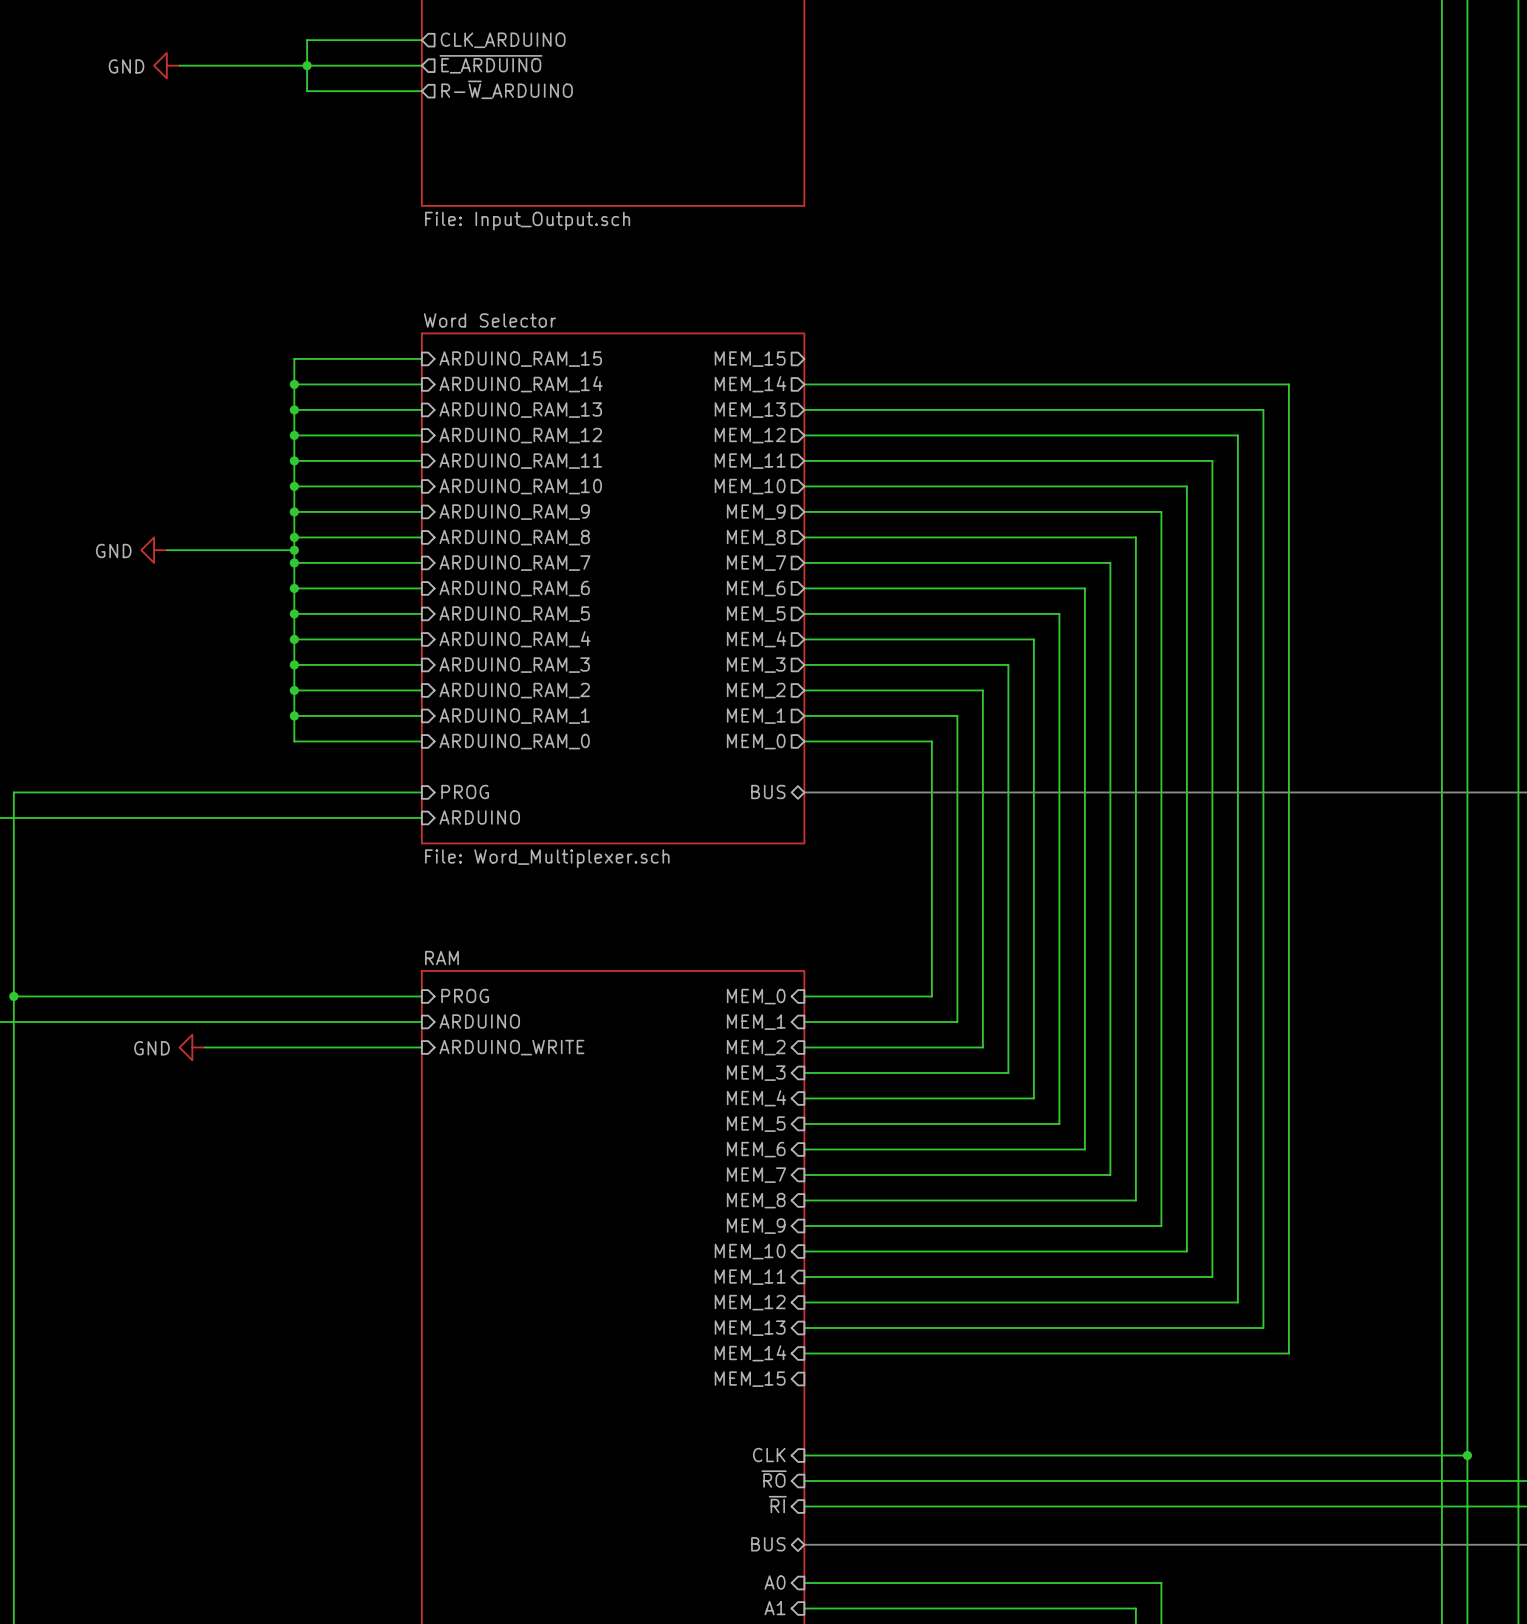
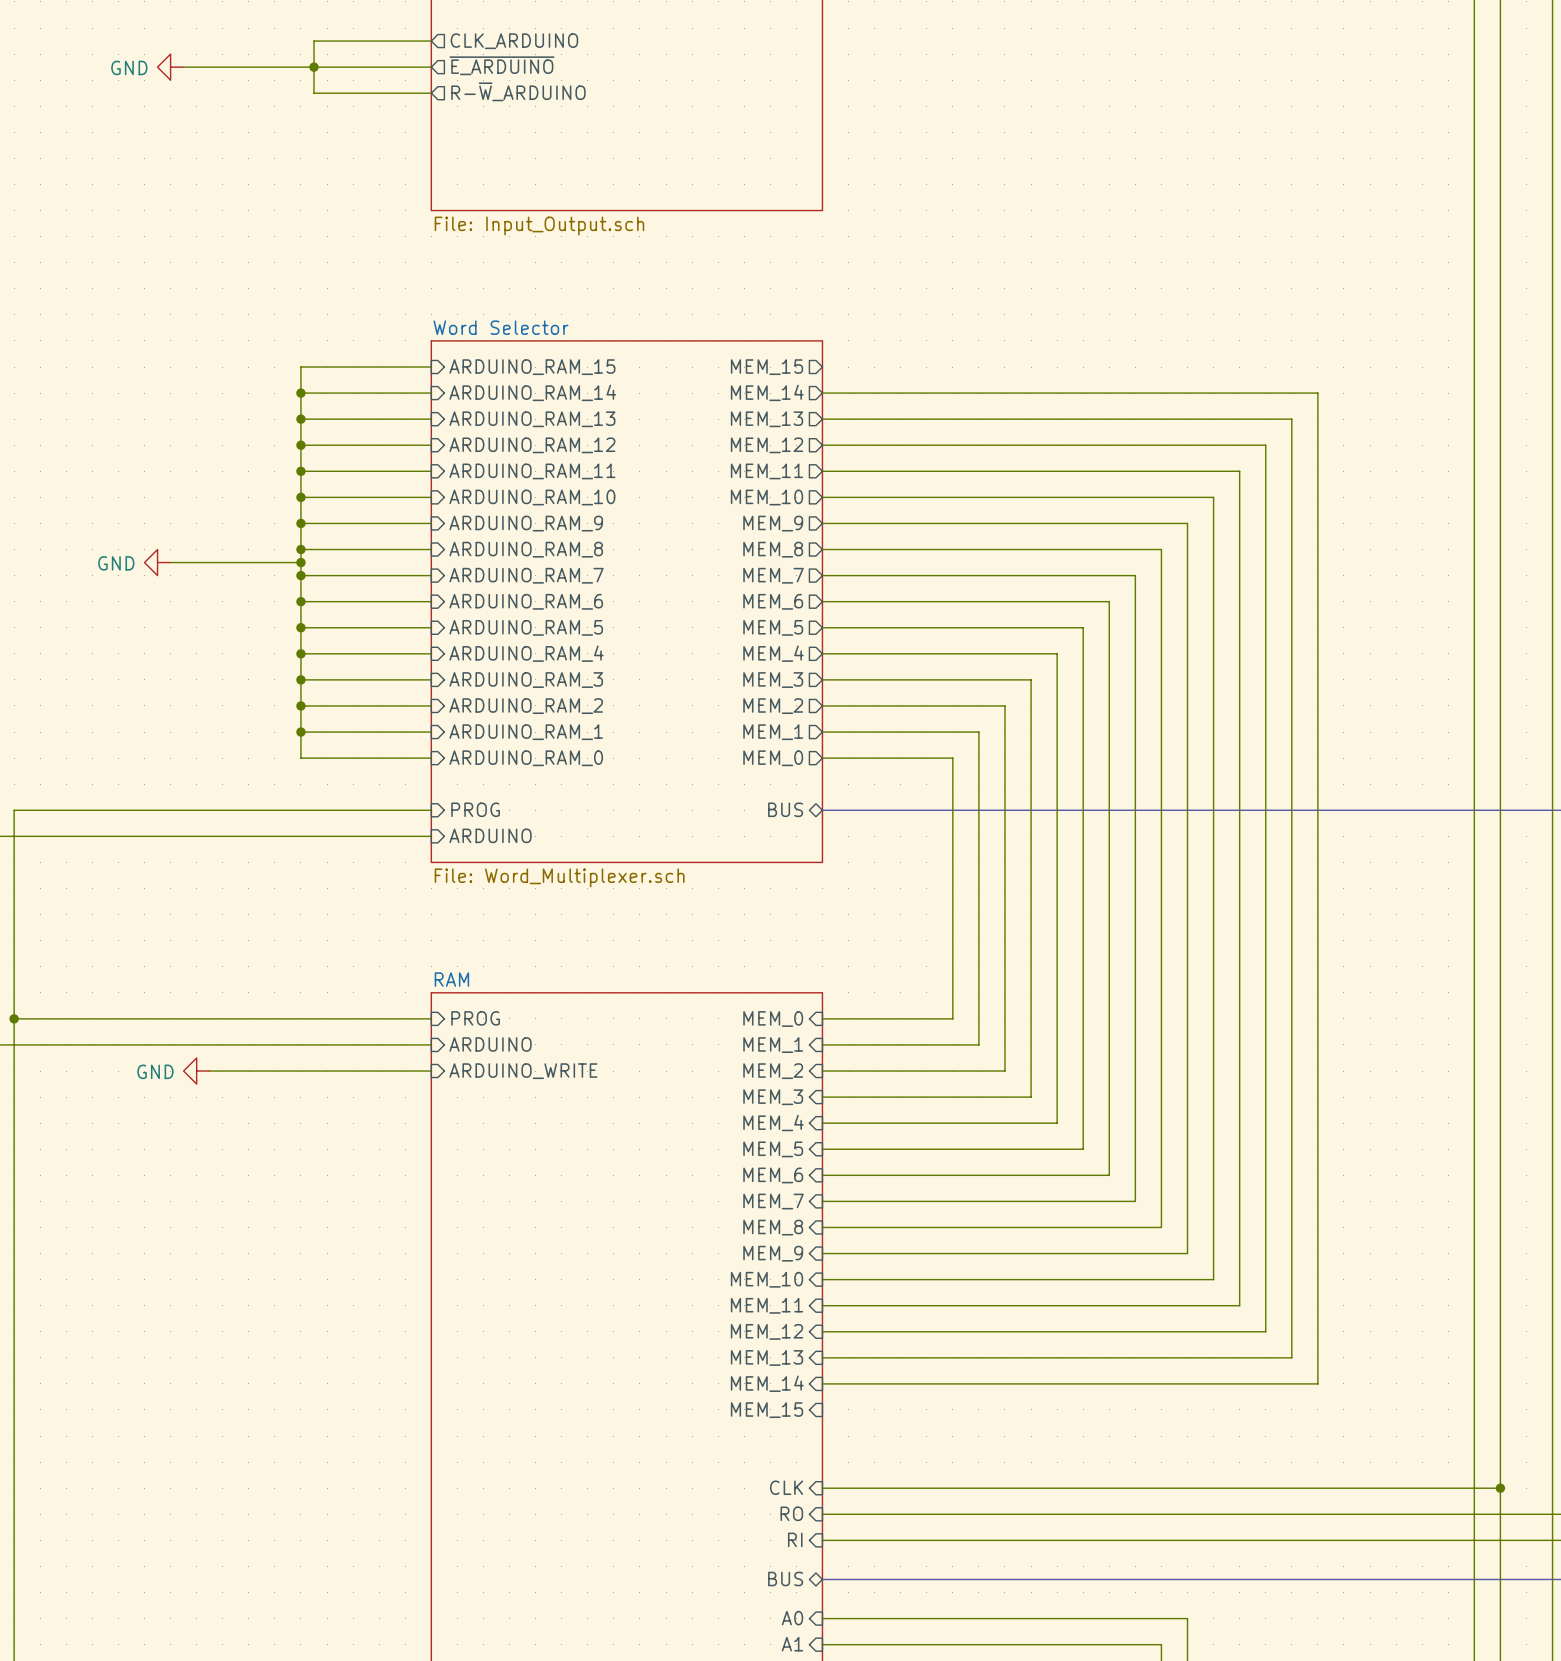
sheet pin: ~{RO} (774, 1479) -> RO (791, 1513)
sheet pin: ~{RI} (777, 1504) -> RI (795, 1539)

